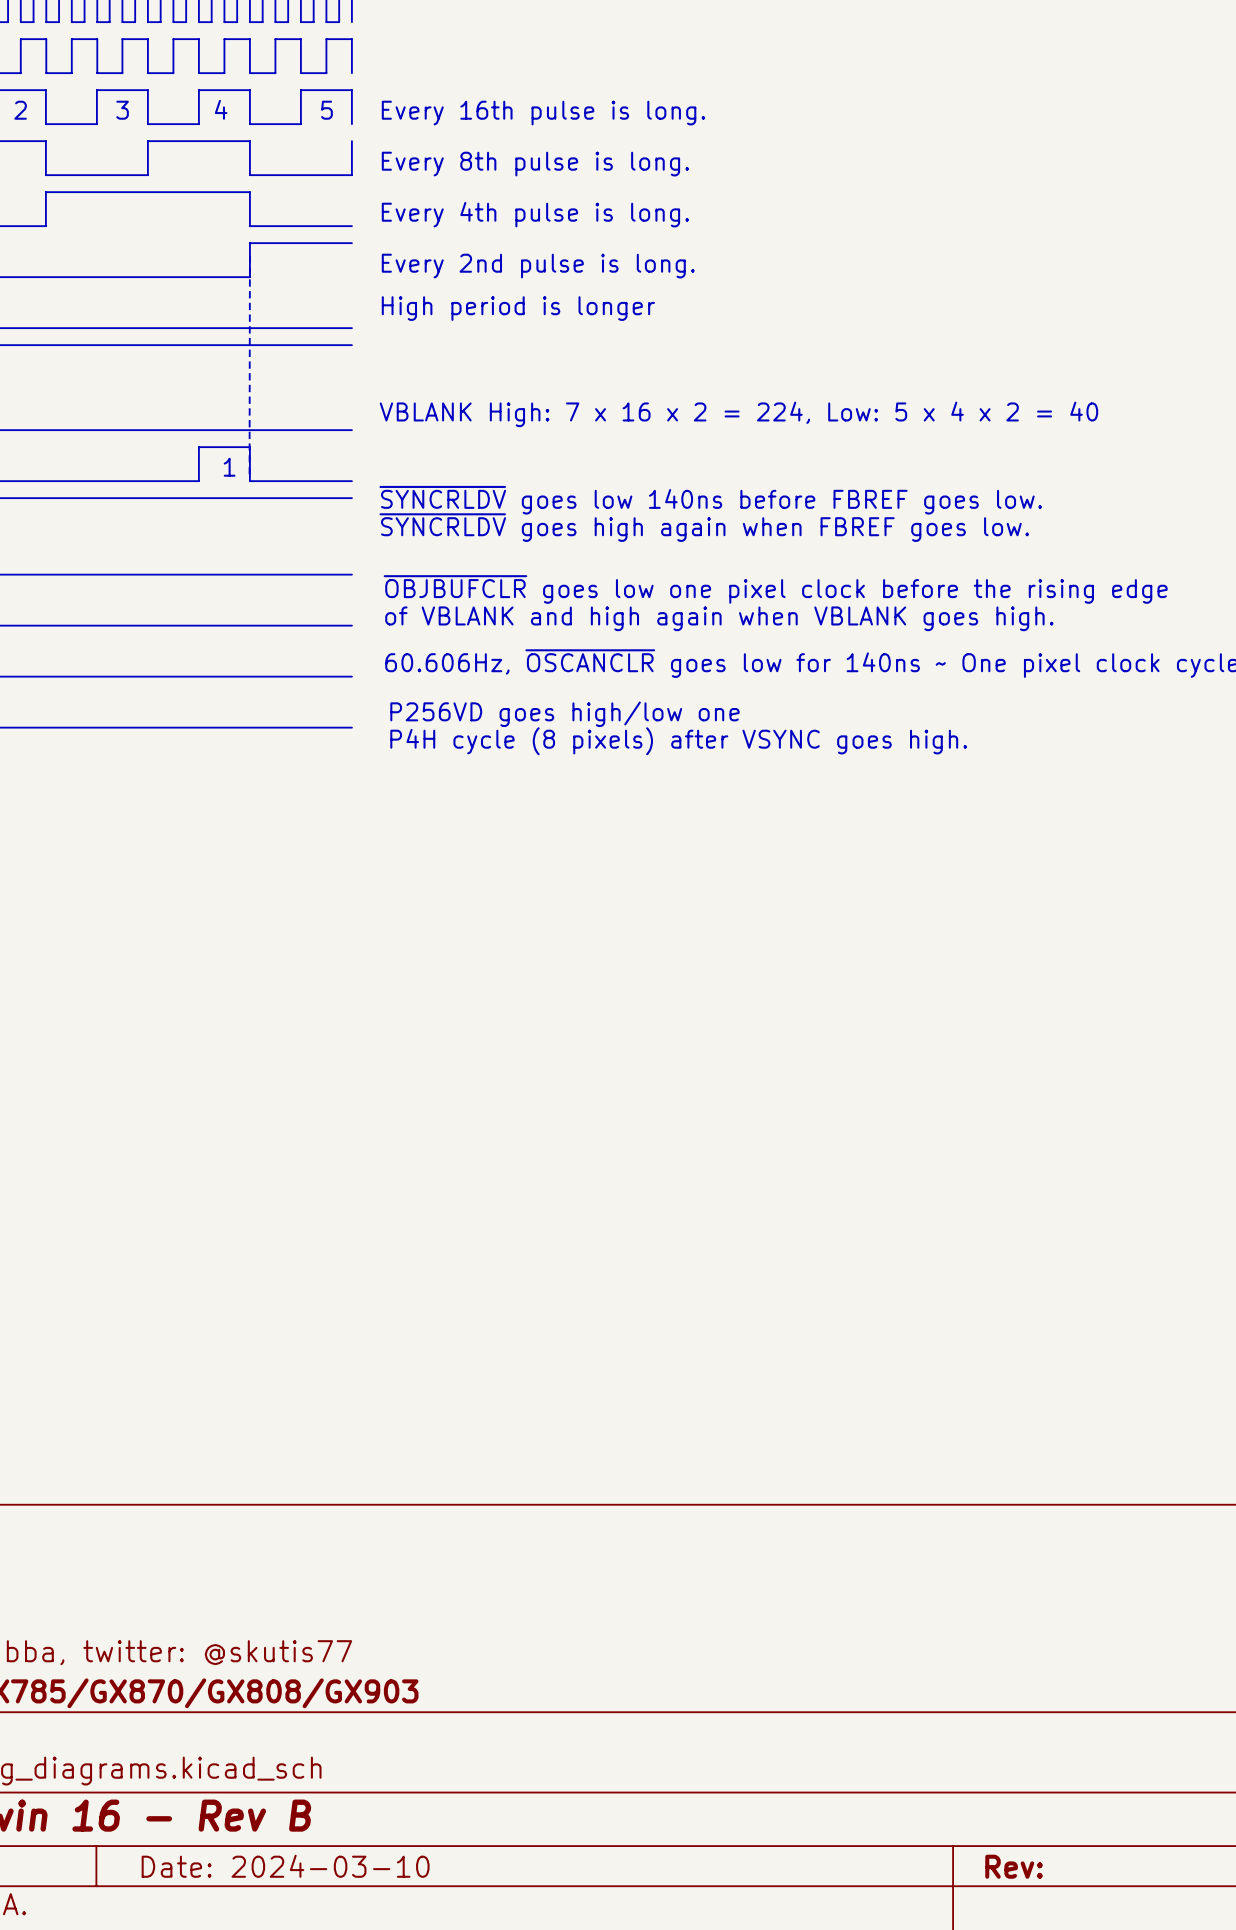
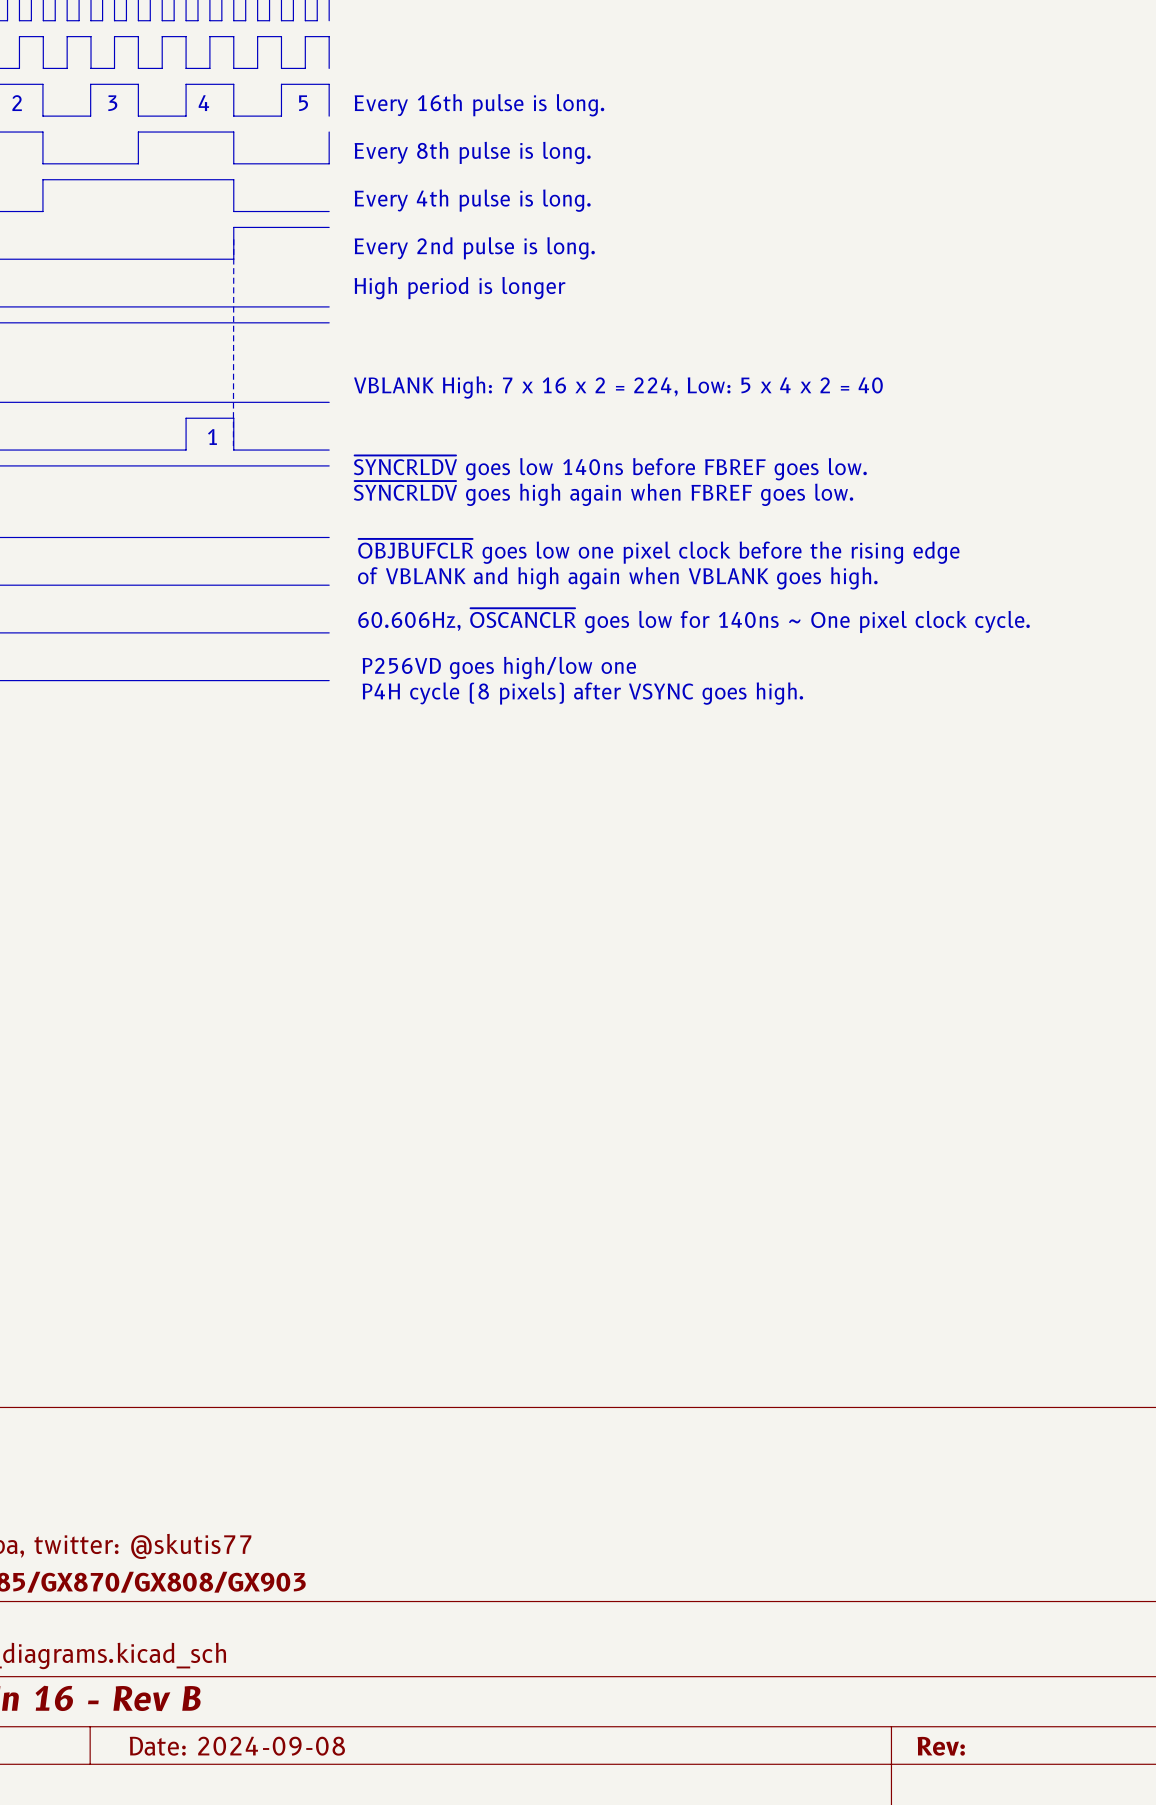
title block: Date: 2024-03-10 (285, 1866) -> Date: 2024-09-08 (237, 1746)

